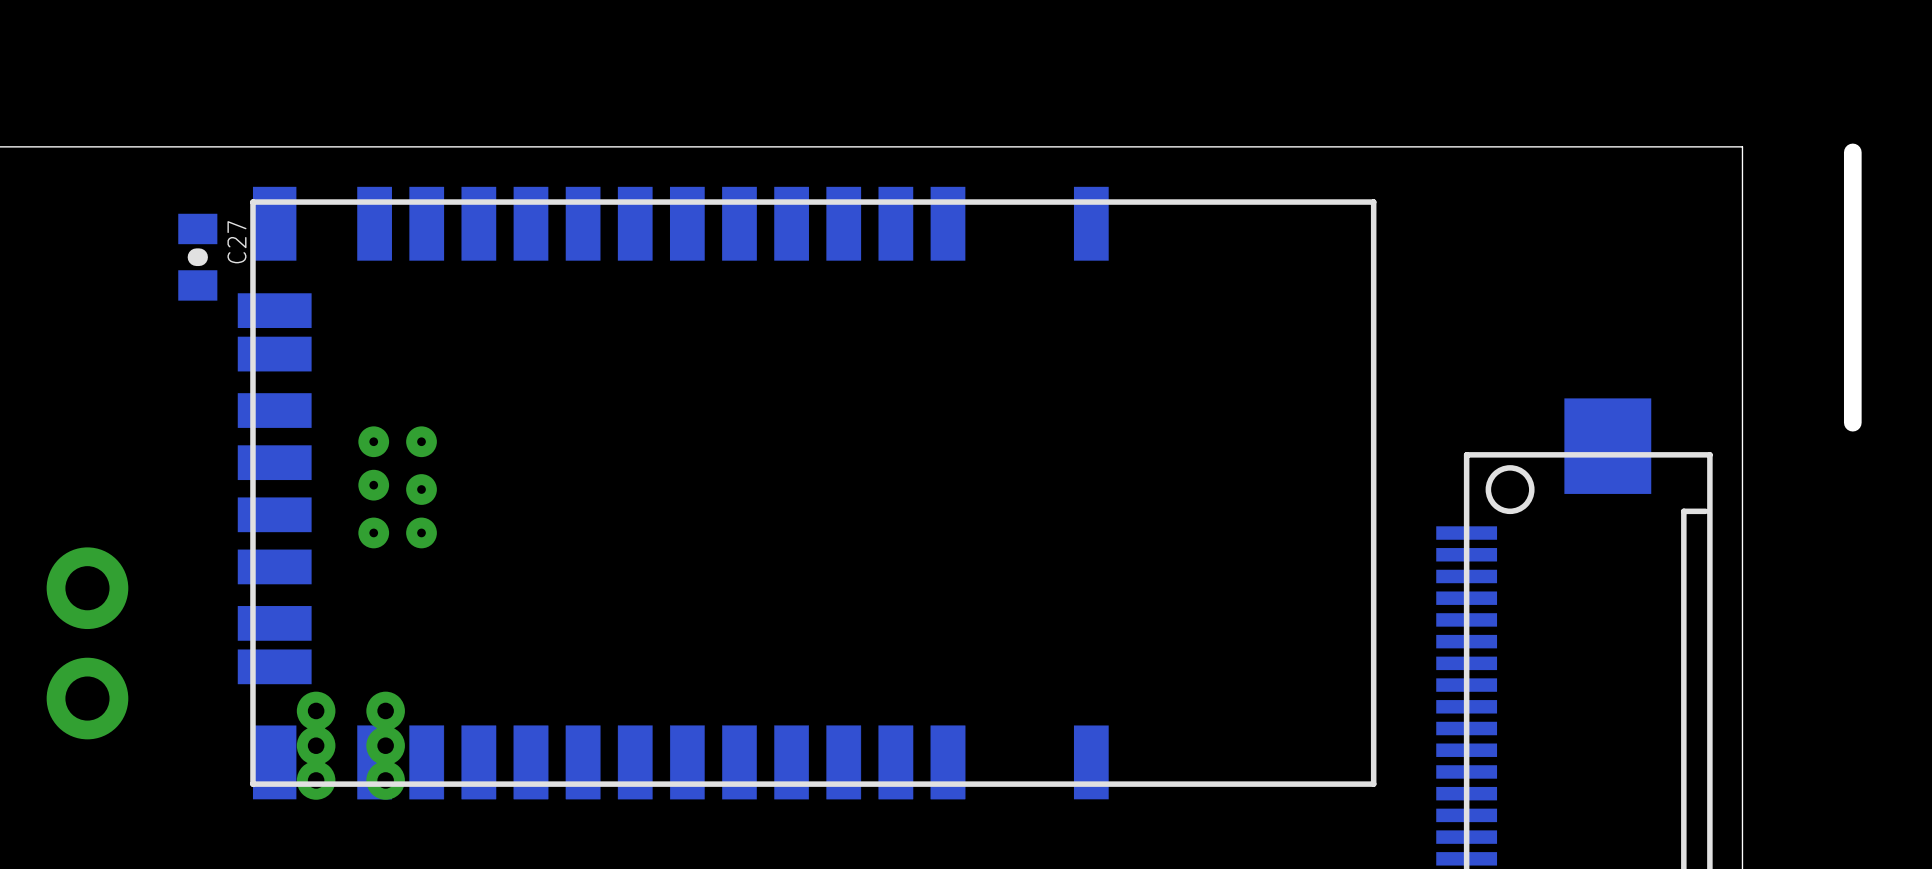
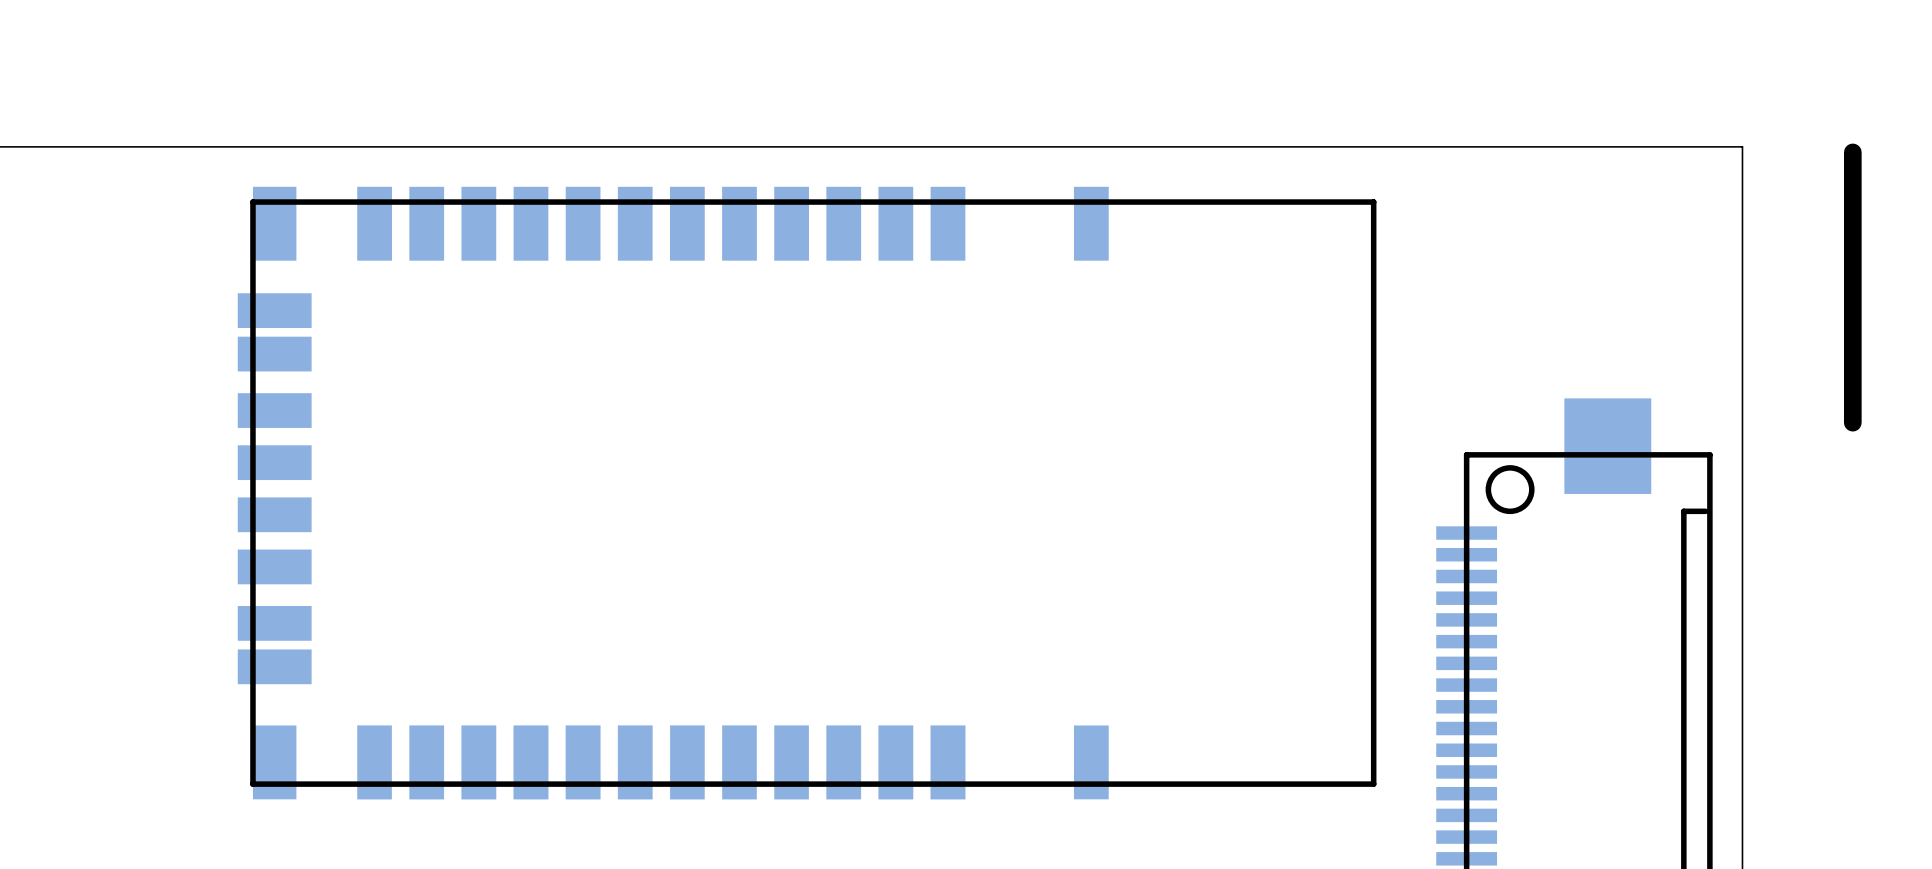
C27: (197, 257) -> none
part: (397, 487) -> none
part: (87, 643) -> none
part: (350, 745) -> none

